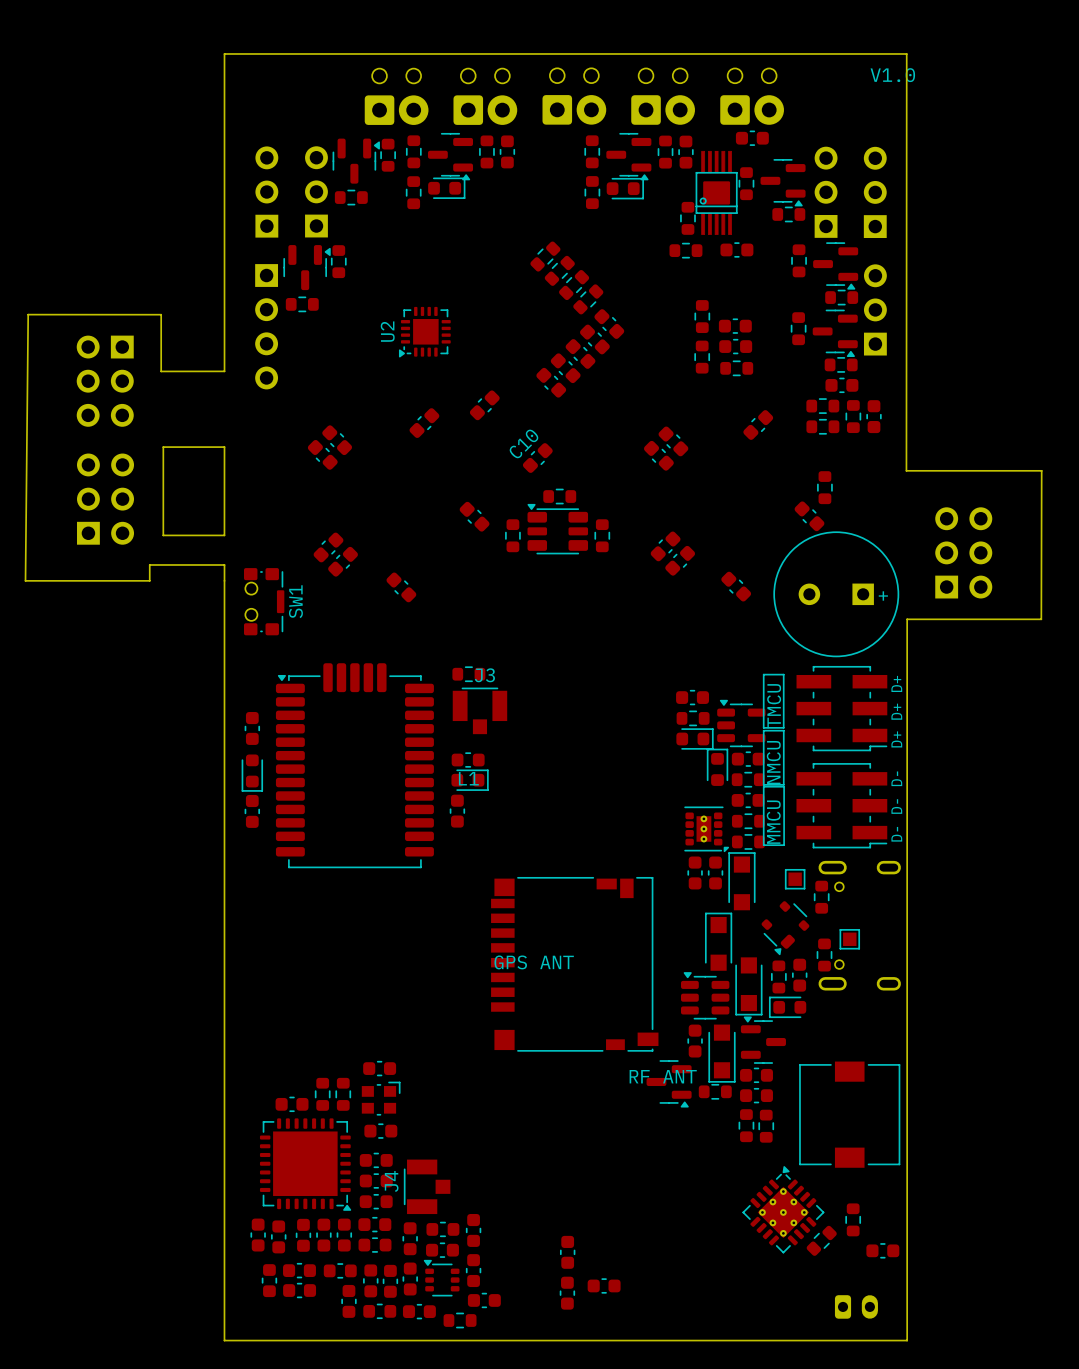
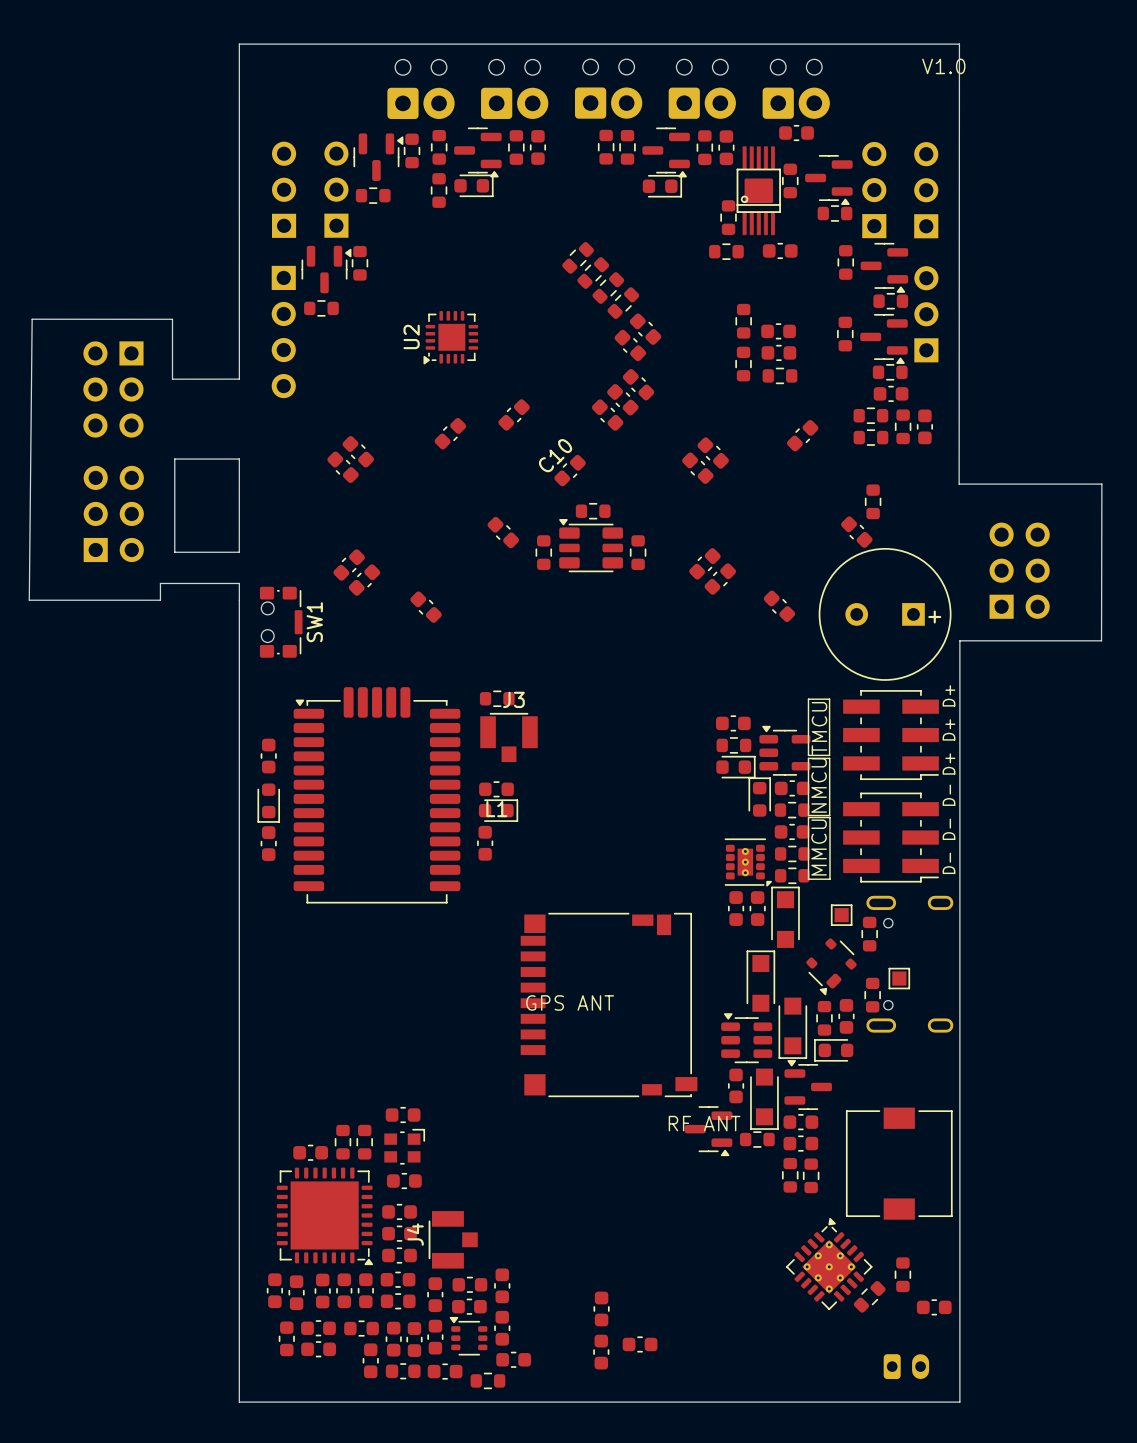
part position: (592, 192) -> (606, 147)
part: (580, 353) -> none
part: (565, 368) -> none
part: none -> (638, 384)
part: (551, 382) -> none
part: none -> (622, 399)
part: none -> (607, 415)

